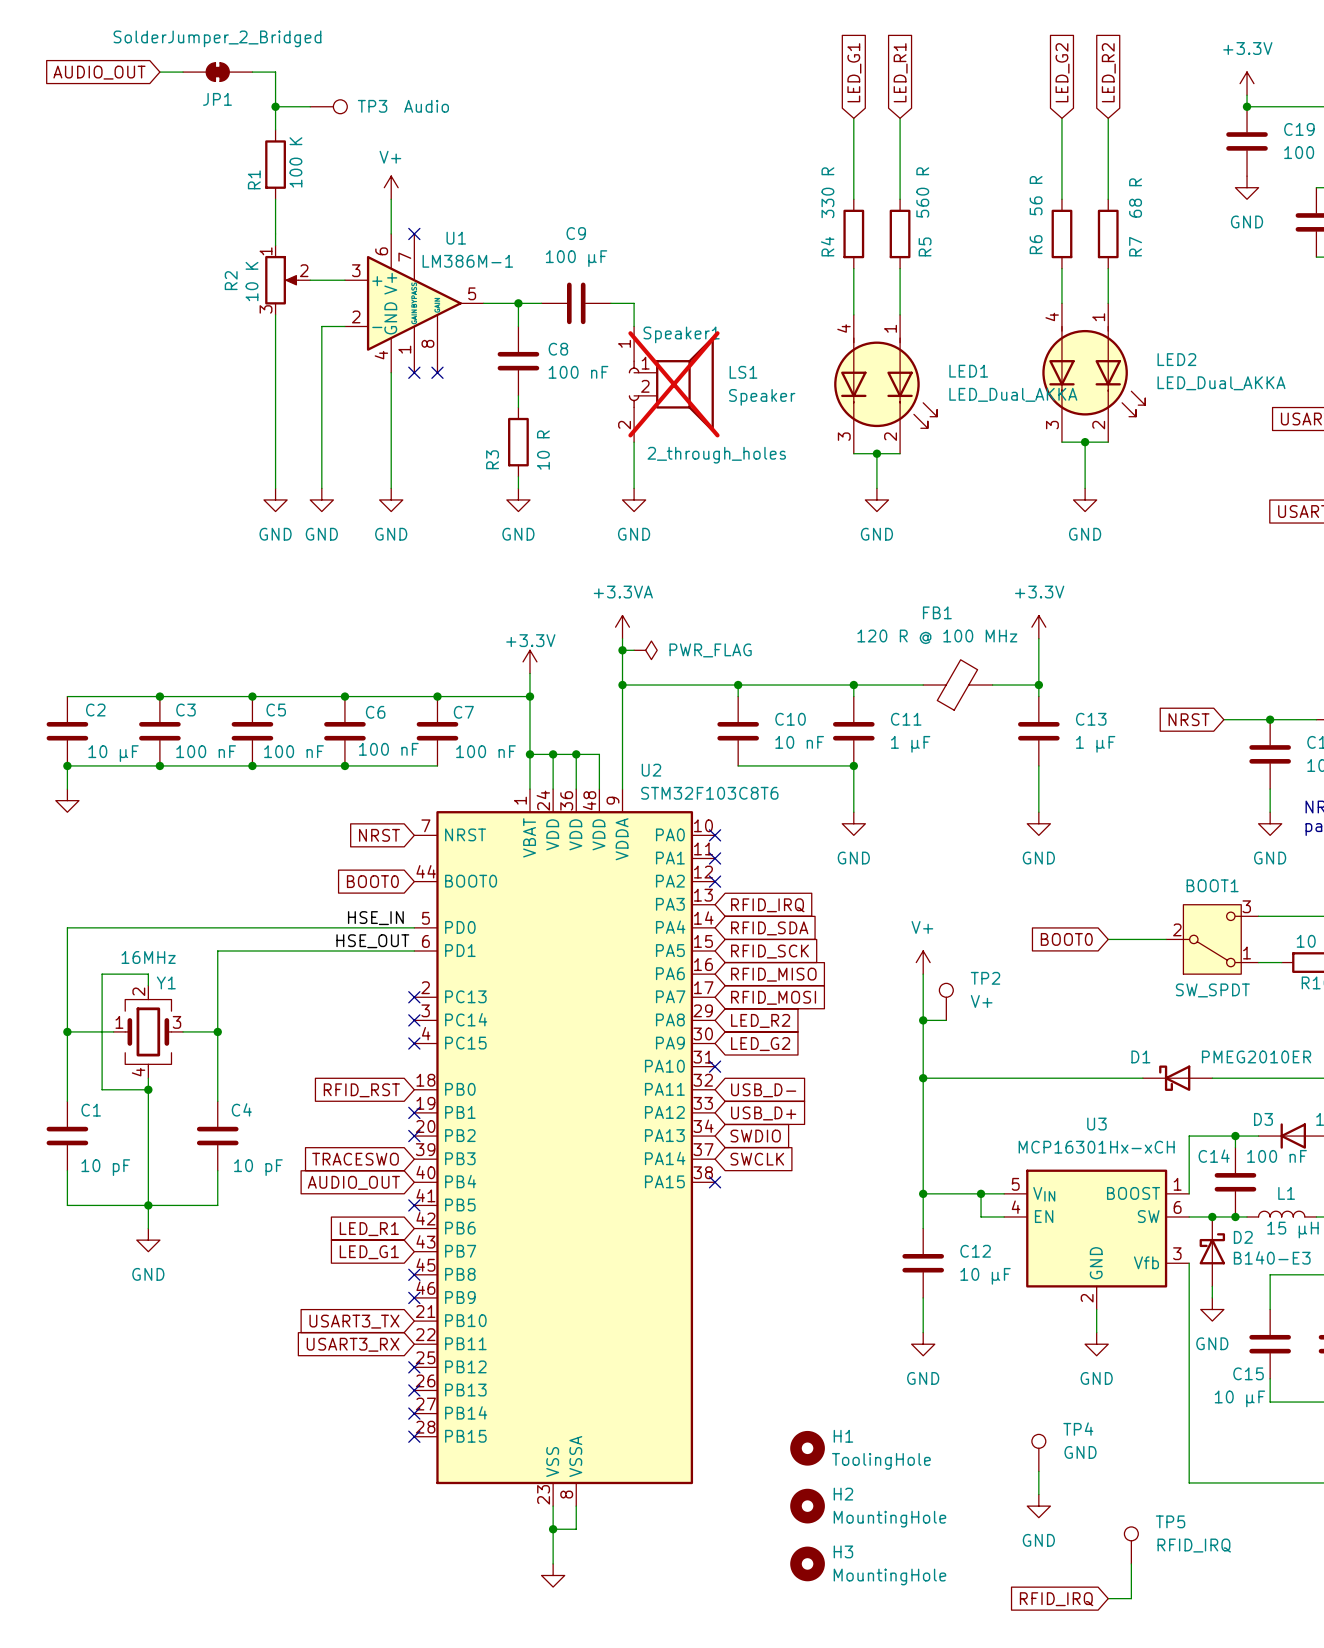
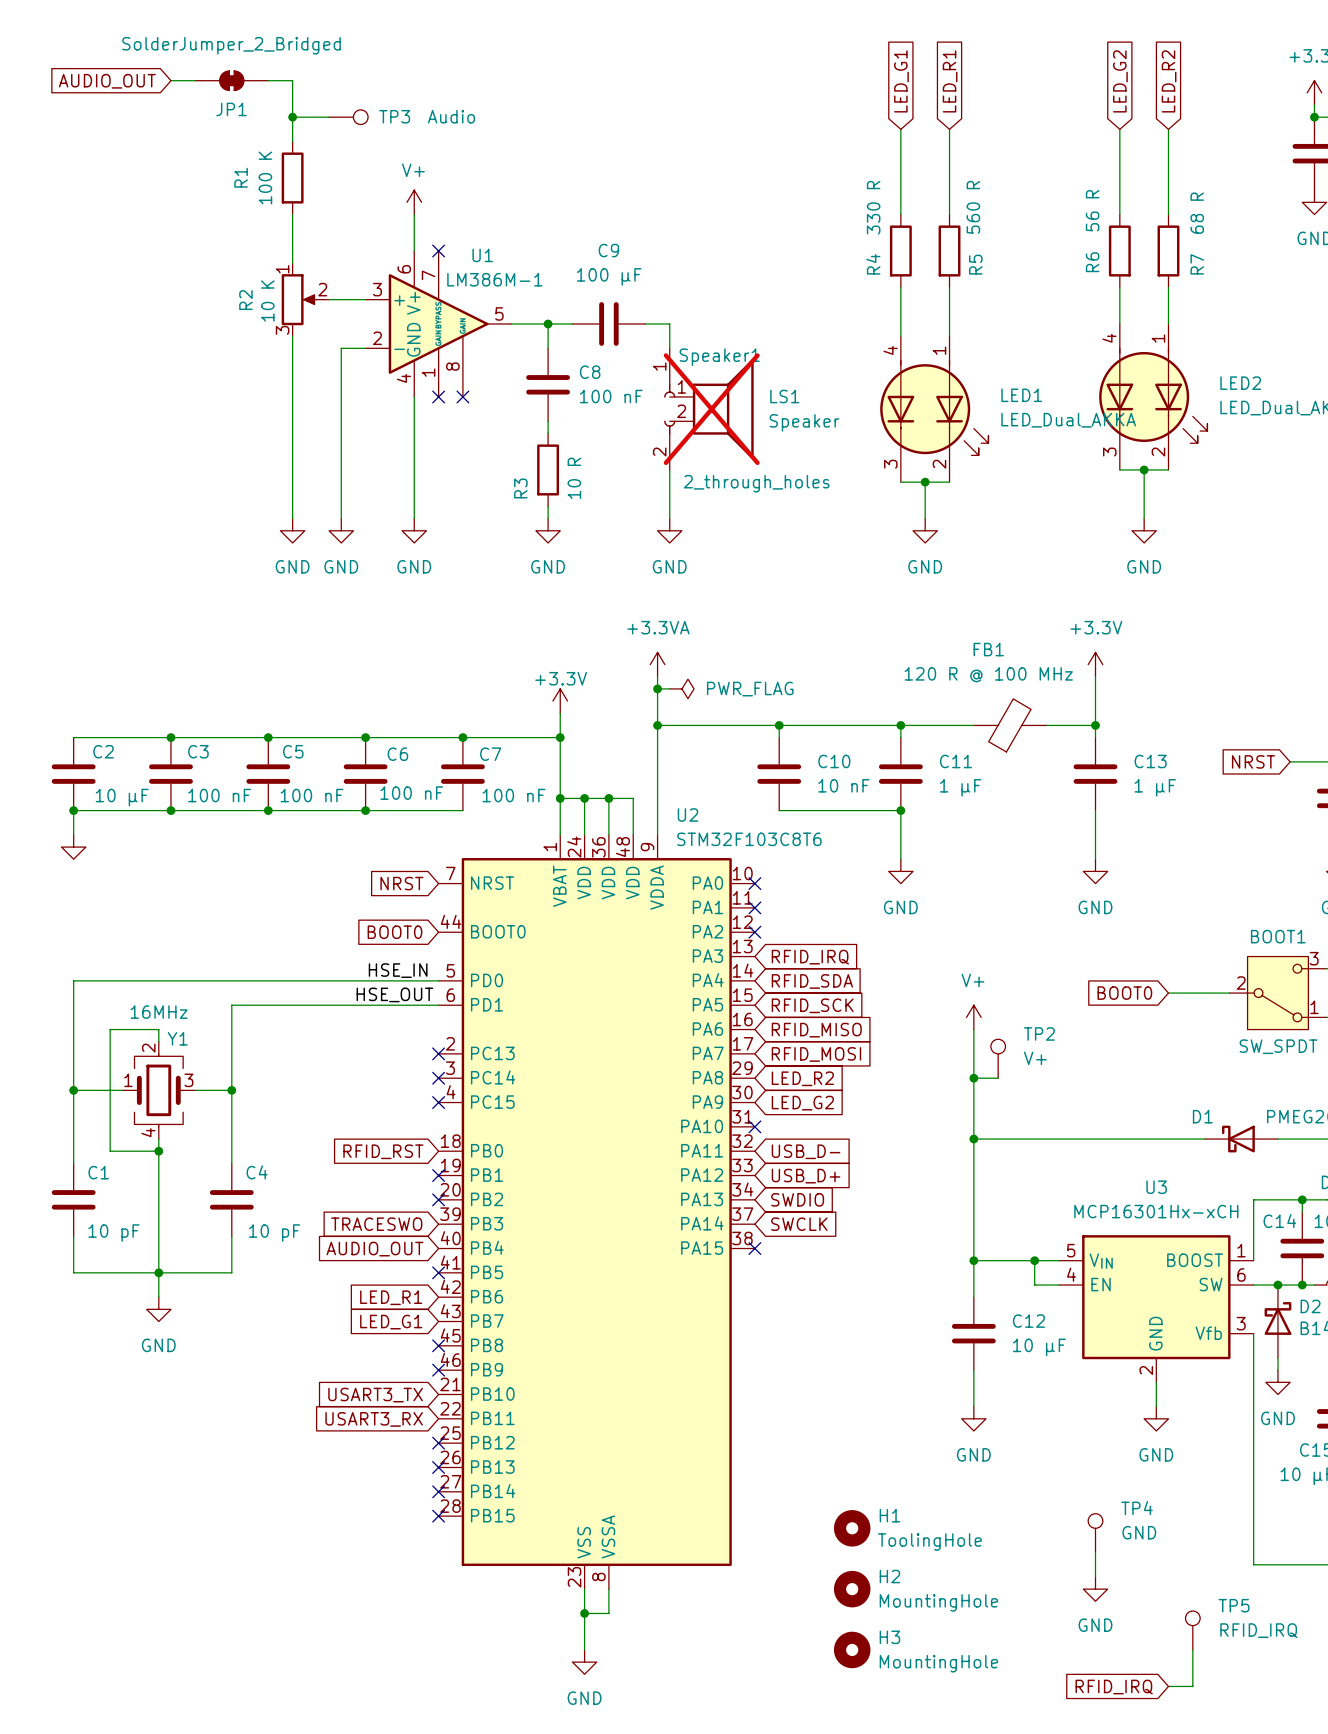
R1 value position: 100 K (295, 162) -> 100 K (265, 178)
R1 name position: R1 (254, 179) -> R1 (241, 177)
power symbol text: none -> GND (584, 1698)

